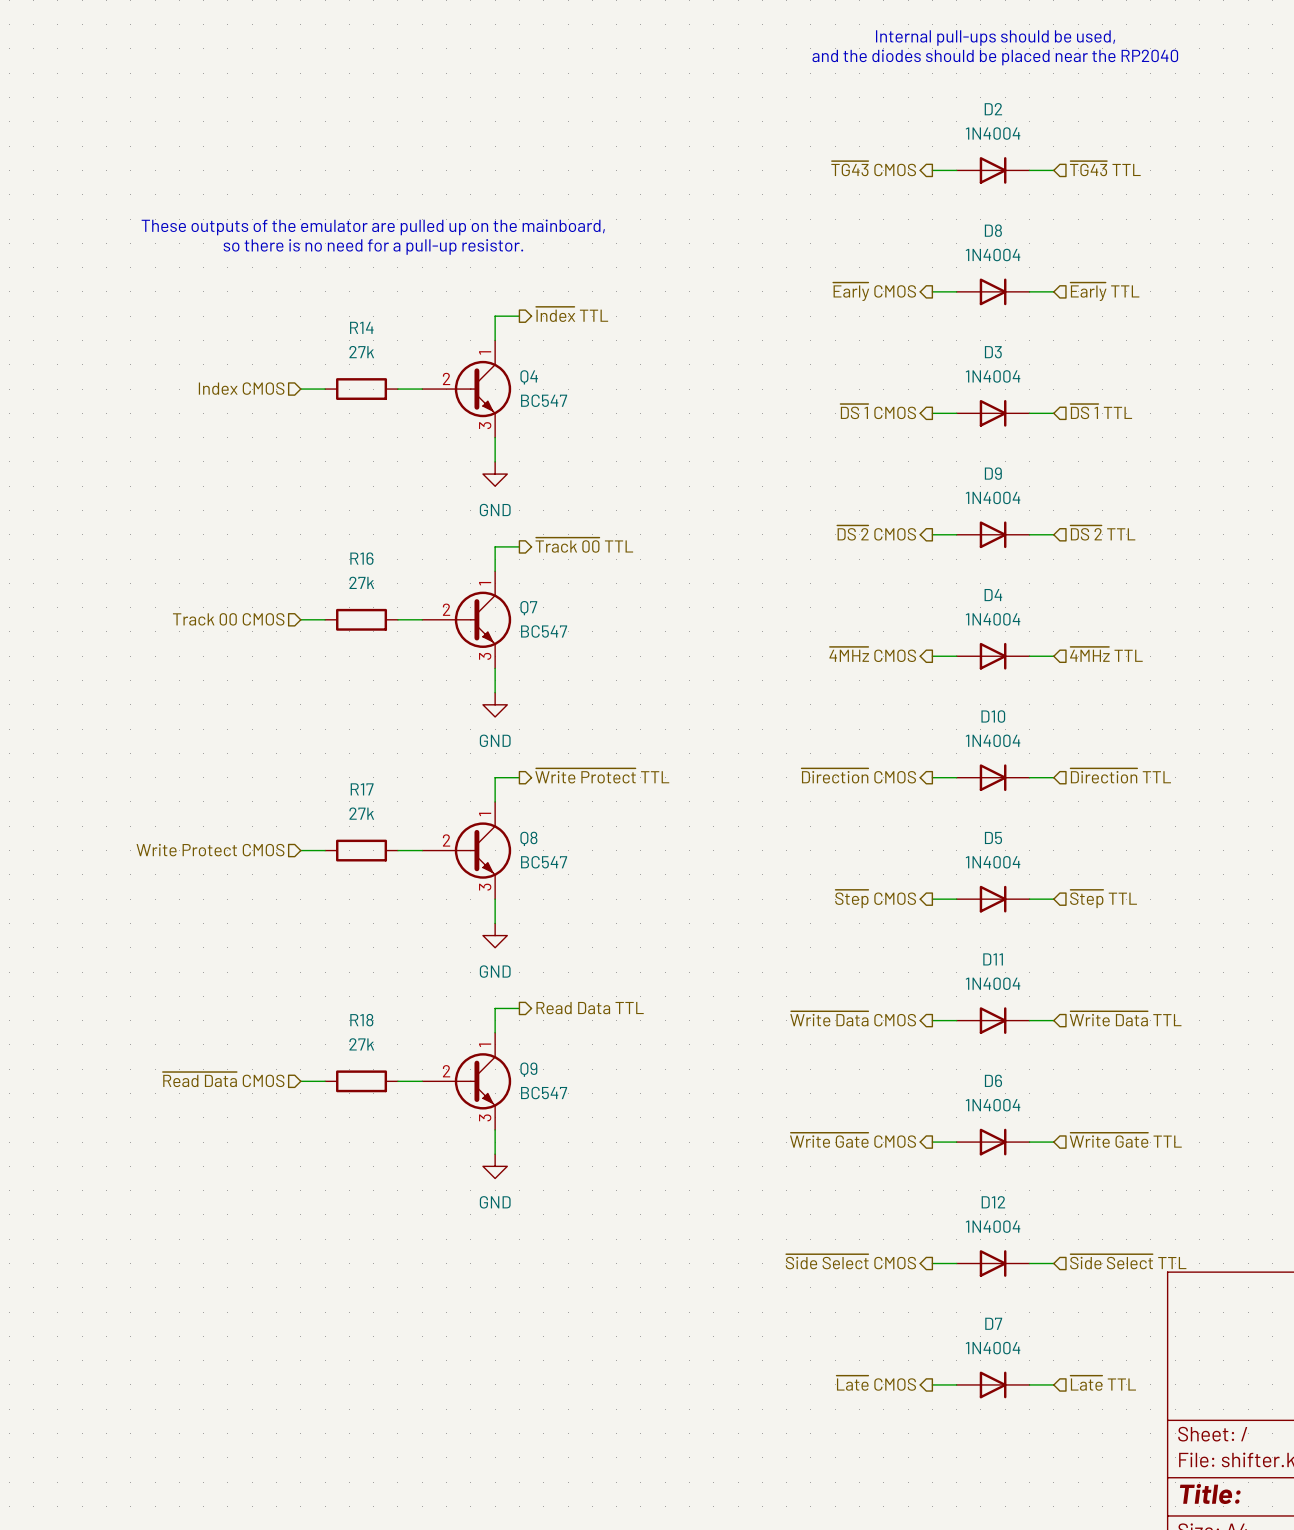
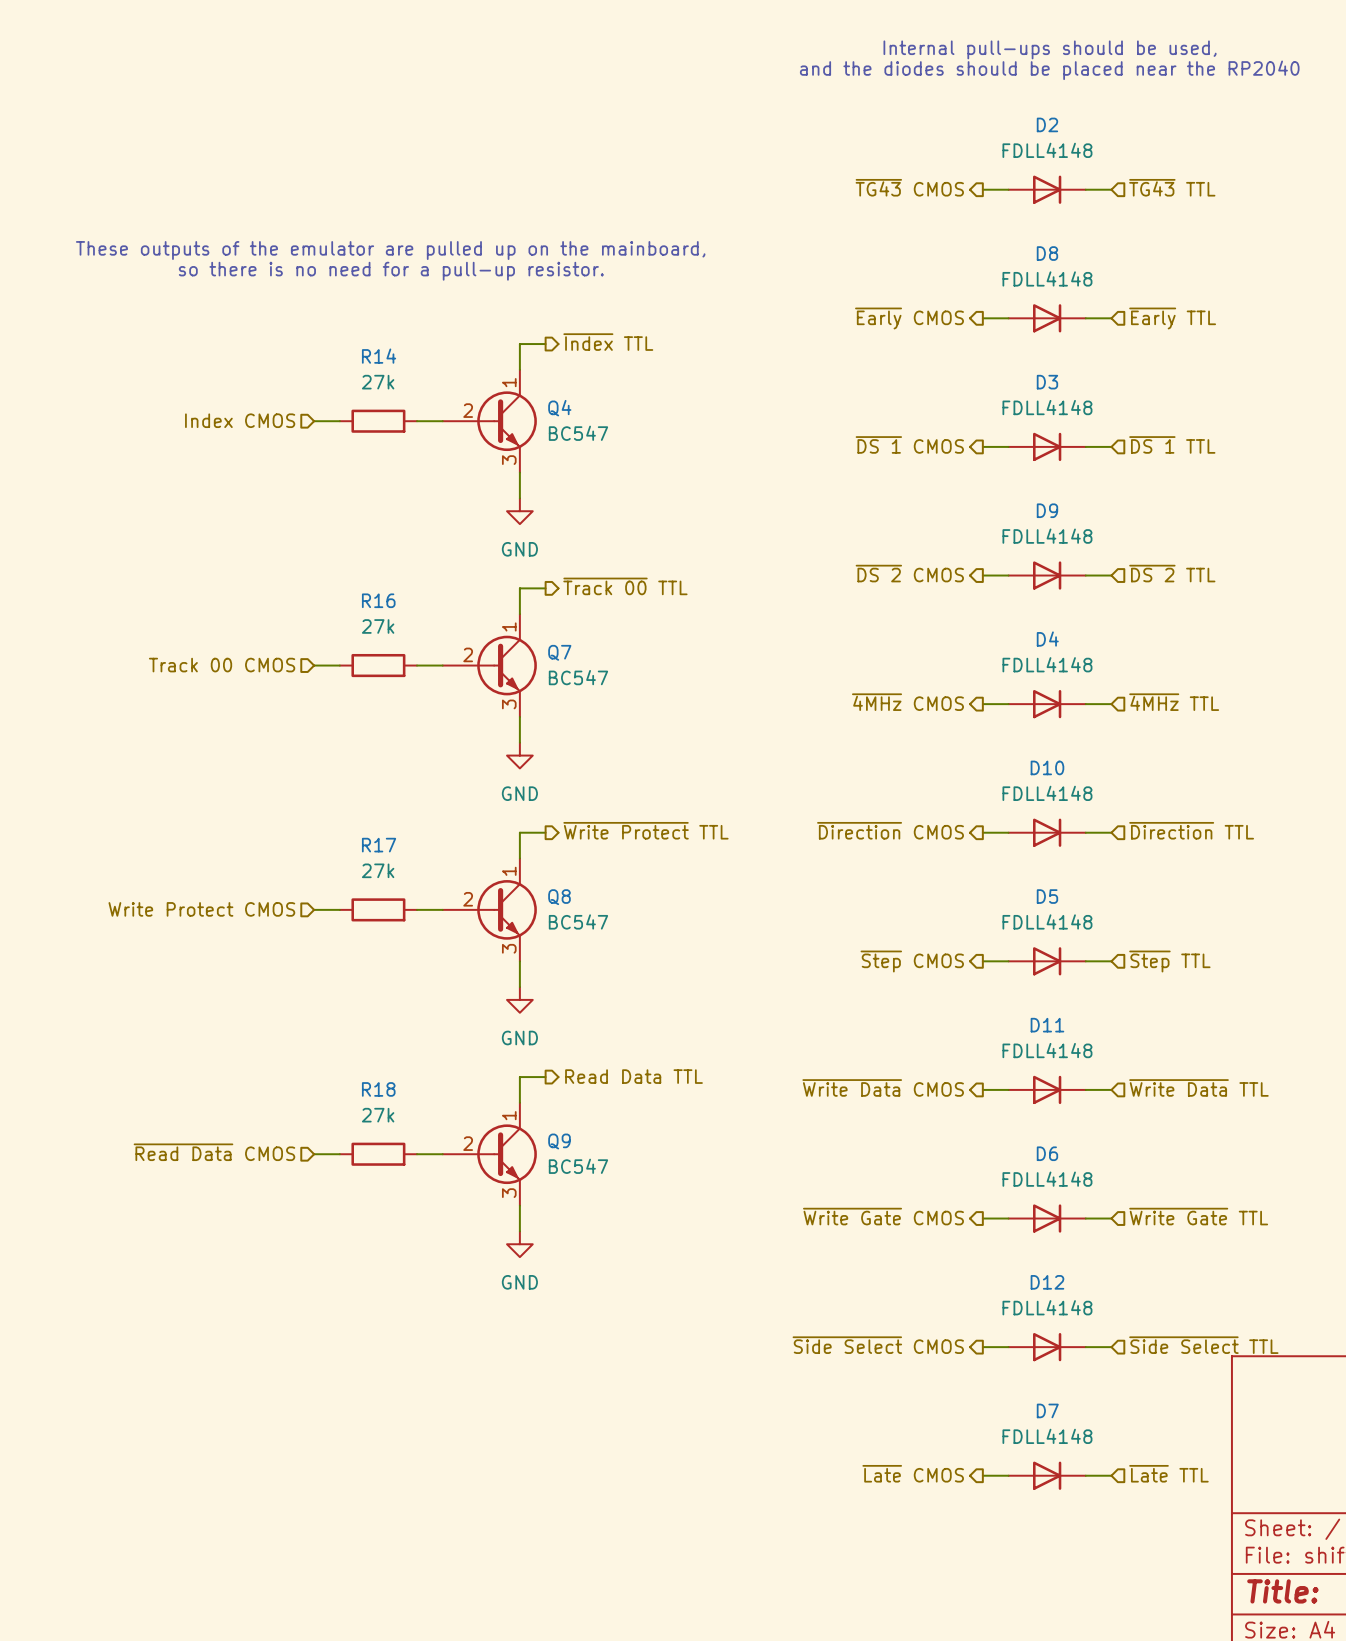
D2 value: 1N4004 (993, 133) -> FDLL4148 (1047, 150)
D8 value: 1N4004 (993, 254) -> FDLL4148 (1047, 278)
D3 value: 1N4004 (993, 376) -> FDLL4148 (1047, 407)
D9 value: 1N4004 (993, 497) -> FDLL4148 (1047, 536)
D4 value: 1N4004 (993, 619) -> FDLL4148 (1047, 664)
D10 value: 1N4004 (993, 740) -> FDLL4148 (1047, 793)
D5 value: 1N4004 (993, 862) -> FDLL4148 (1047, 921)
D11 value: 1N4004 (993, 983) -> FDLL4148 (1047, 1050)
D6 value: 1N4004 (993, 1105) -> FDLL4148 (1047, 1179)
D12 value: 1N4004 (993, 1226) -> FDLL4148 (1047, 1307)
D7 value: 1N4004 (993, 1348) -> FDLL4148 (1047, 1436)

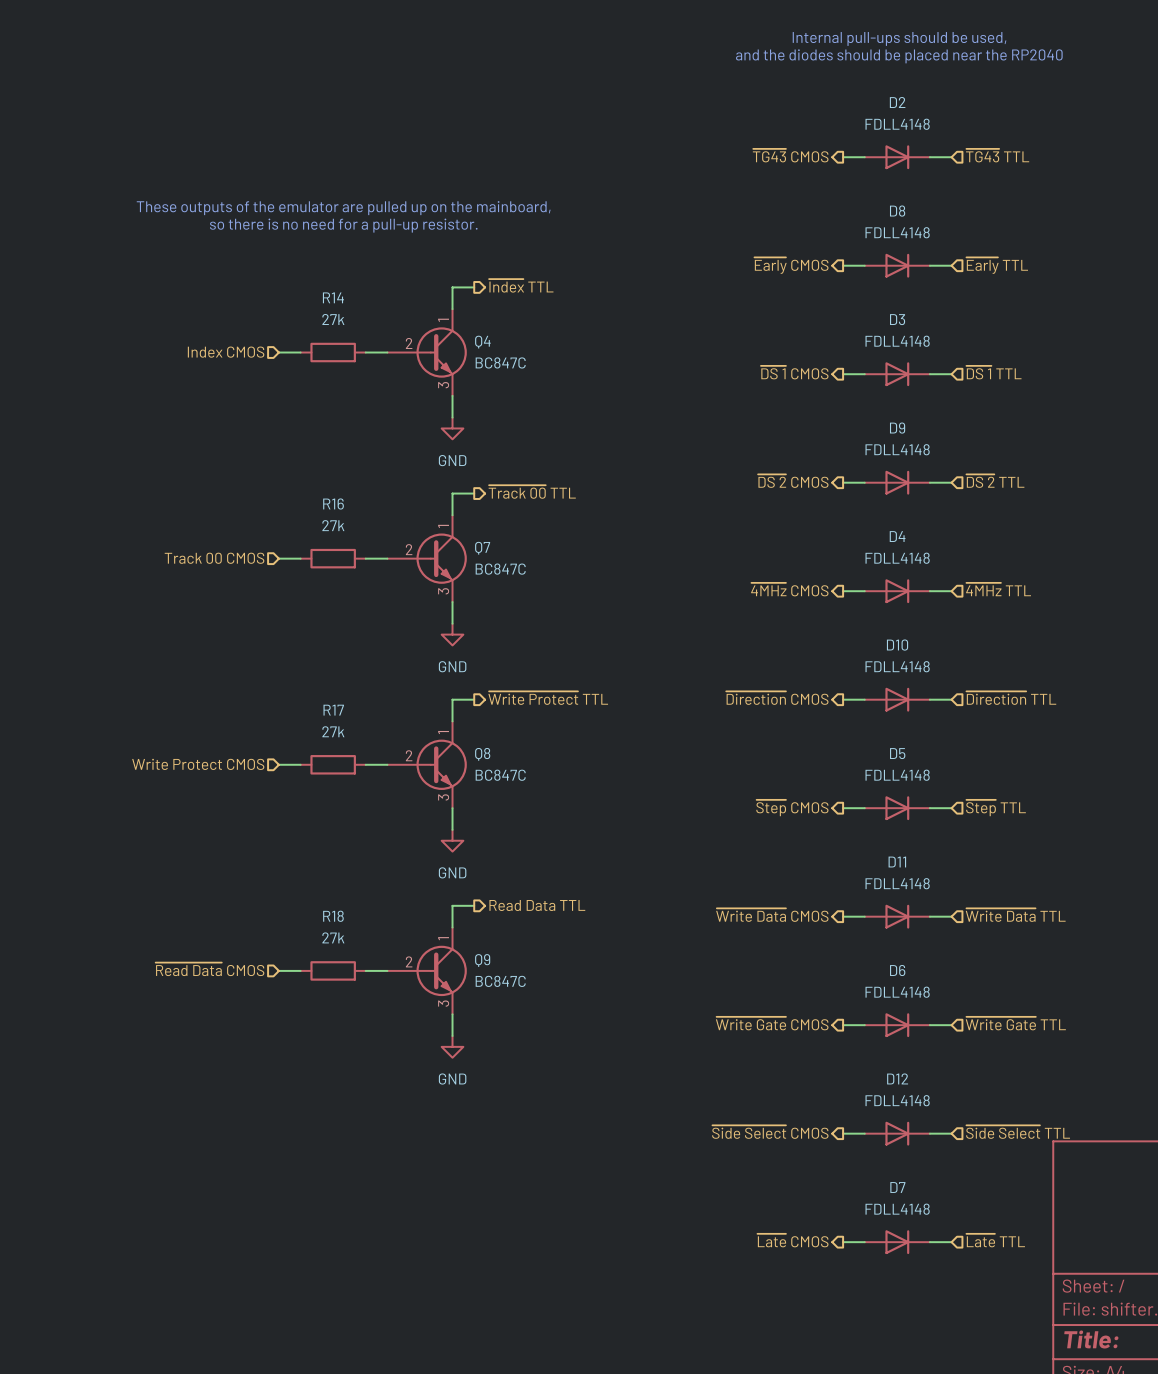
Q4 value: BC547 (578, 433) -> BC847C (500, 362)
Q7 value: BC547 (578, 677) -> BC847C (500, 569)
Q8 value: BC547 (578, 921) -> BC847C (500, 775)
Q9 value: BC547 (578, 1166) -> BC847C (500, 981)

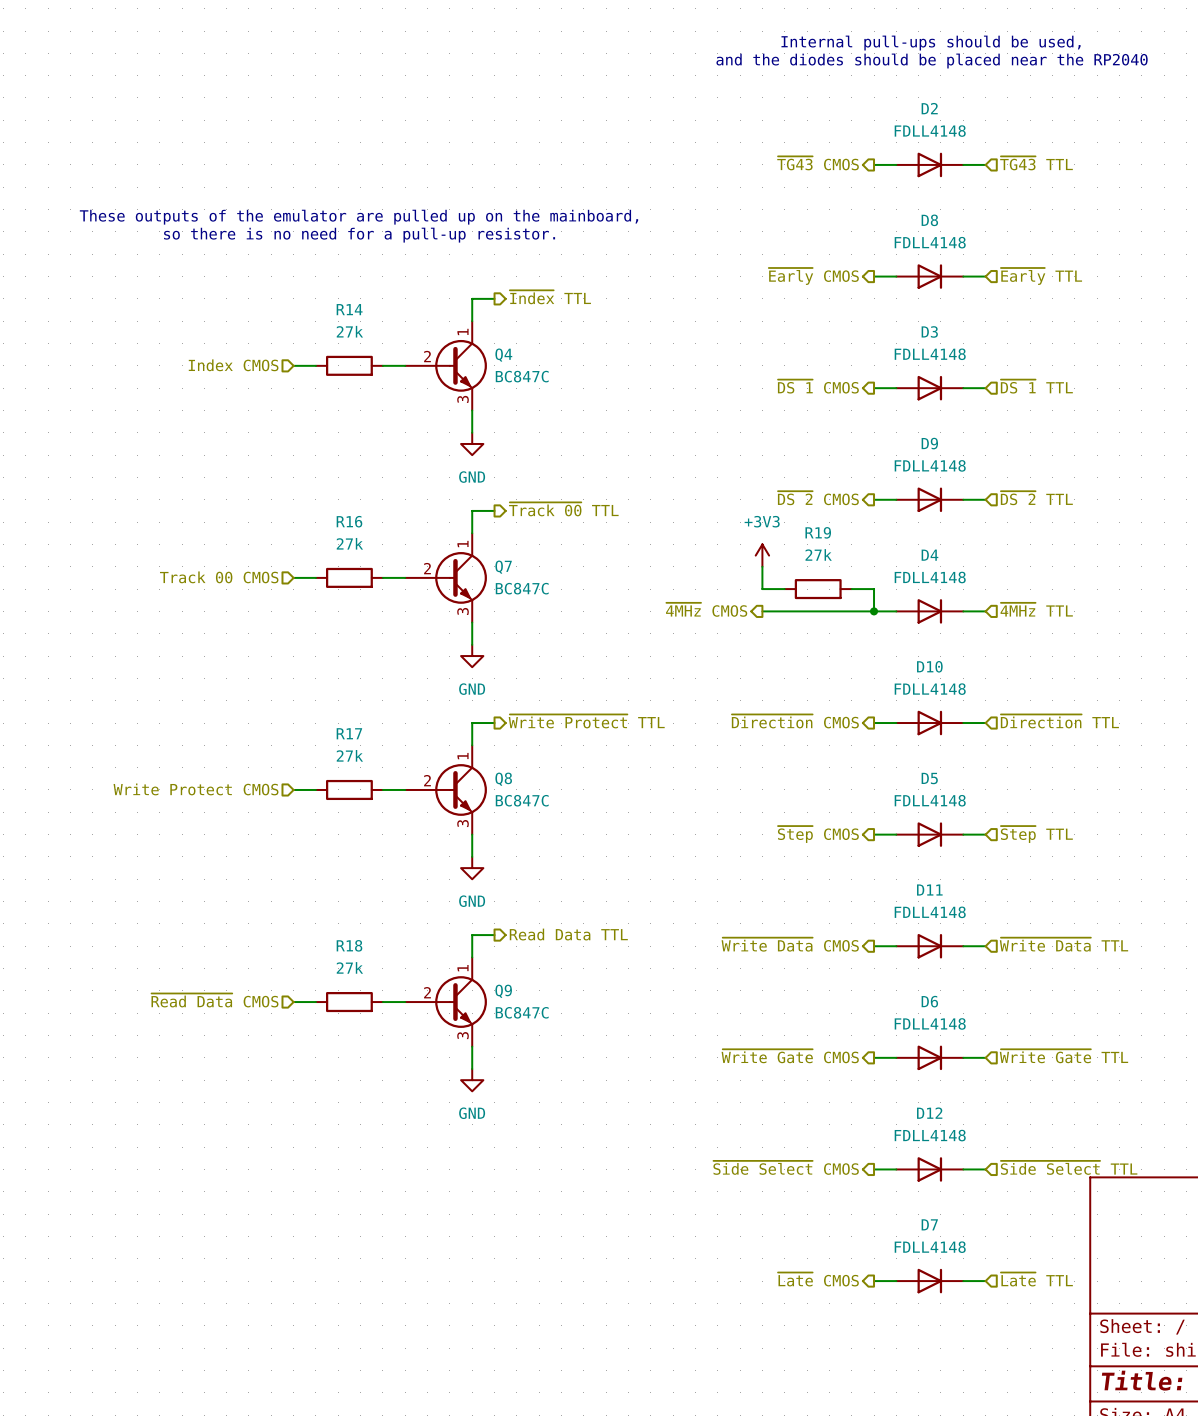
power symbol: none -> +3V3 (762, 555)
wire: none -> (762, 566) (762, 589) (784, 589)
R19: none -> 27k (818, 589)
wire: none -> (851, 589) (874, 589) (874, 611) (762, 611)
hierarchical label position: ~{4MHz} CMOS (789, 589) -> ~{4MHz} CMOS (706, 609)
junction: none -> (874, 611)

